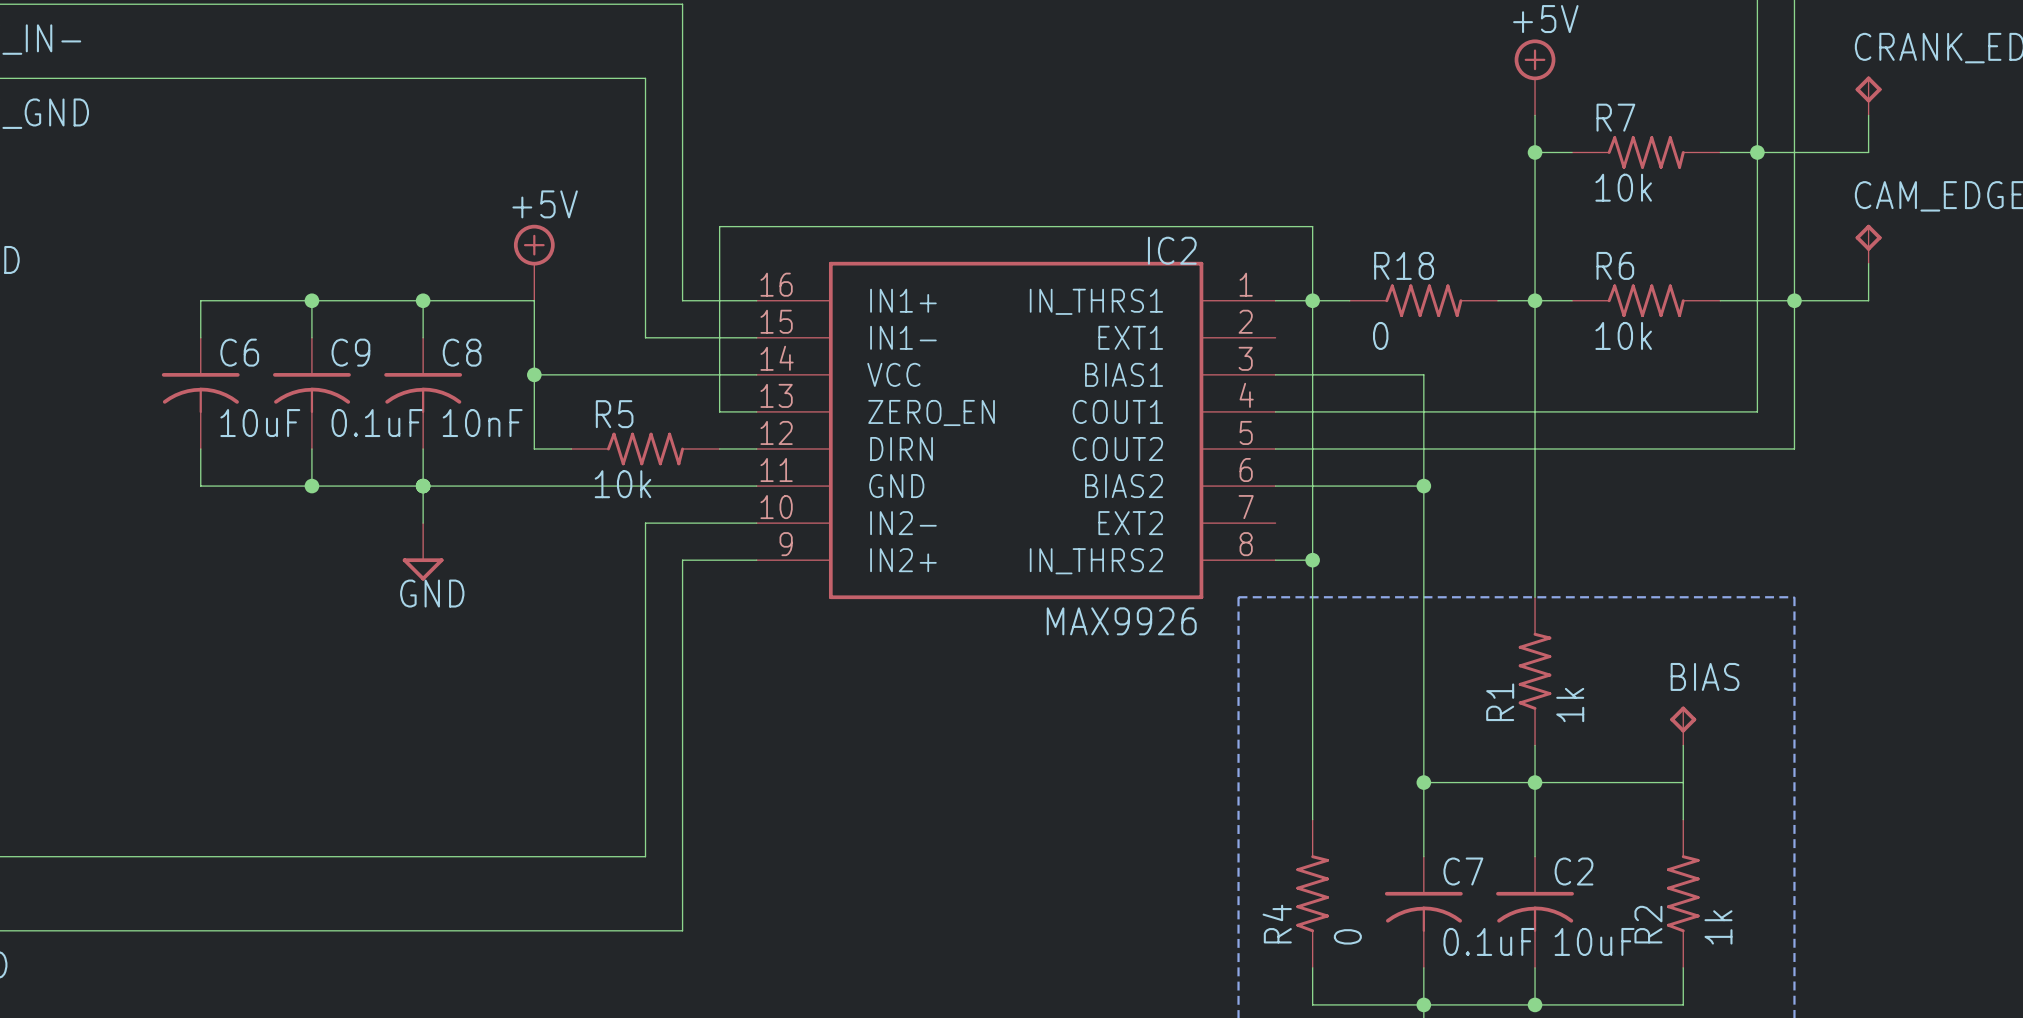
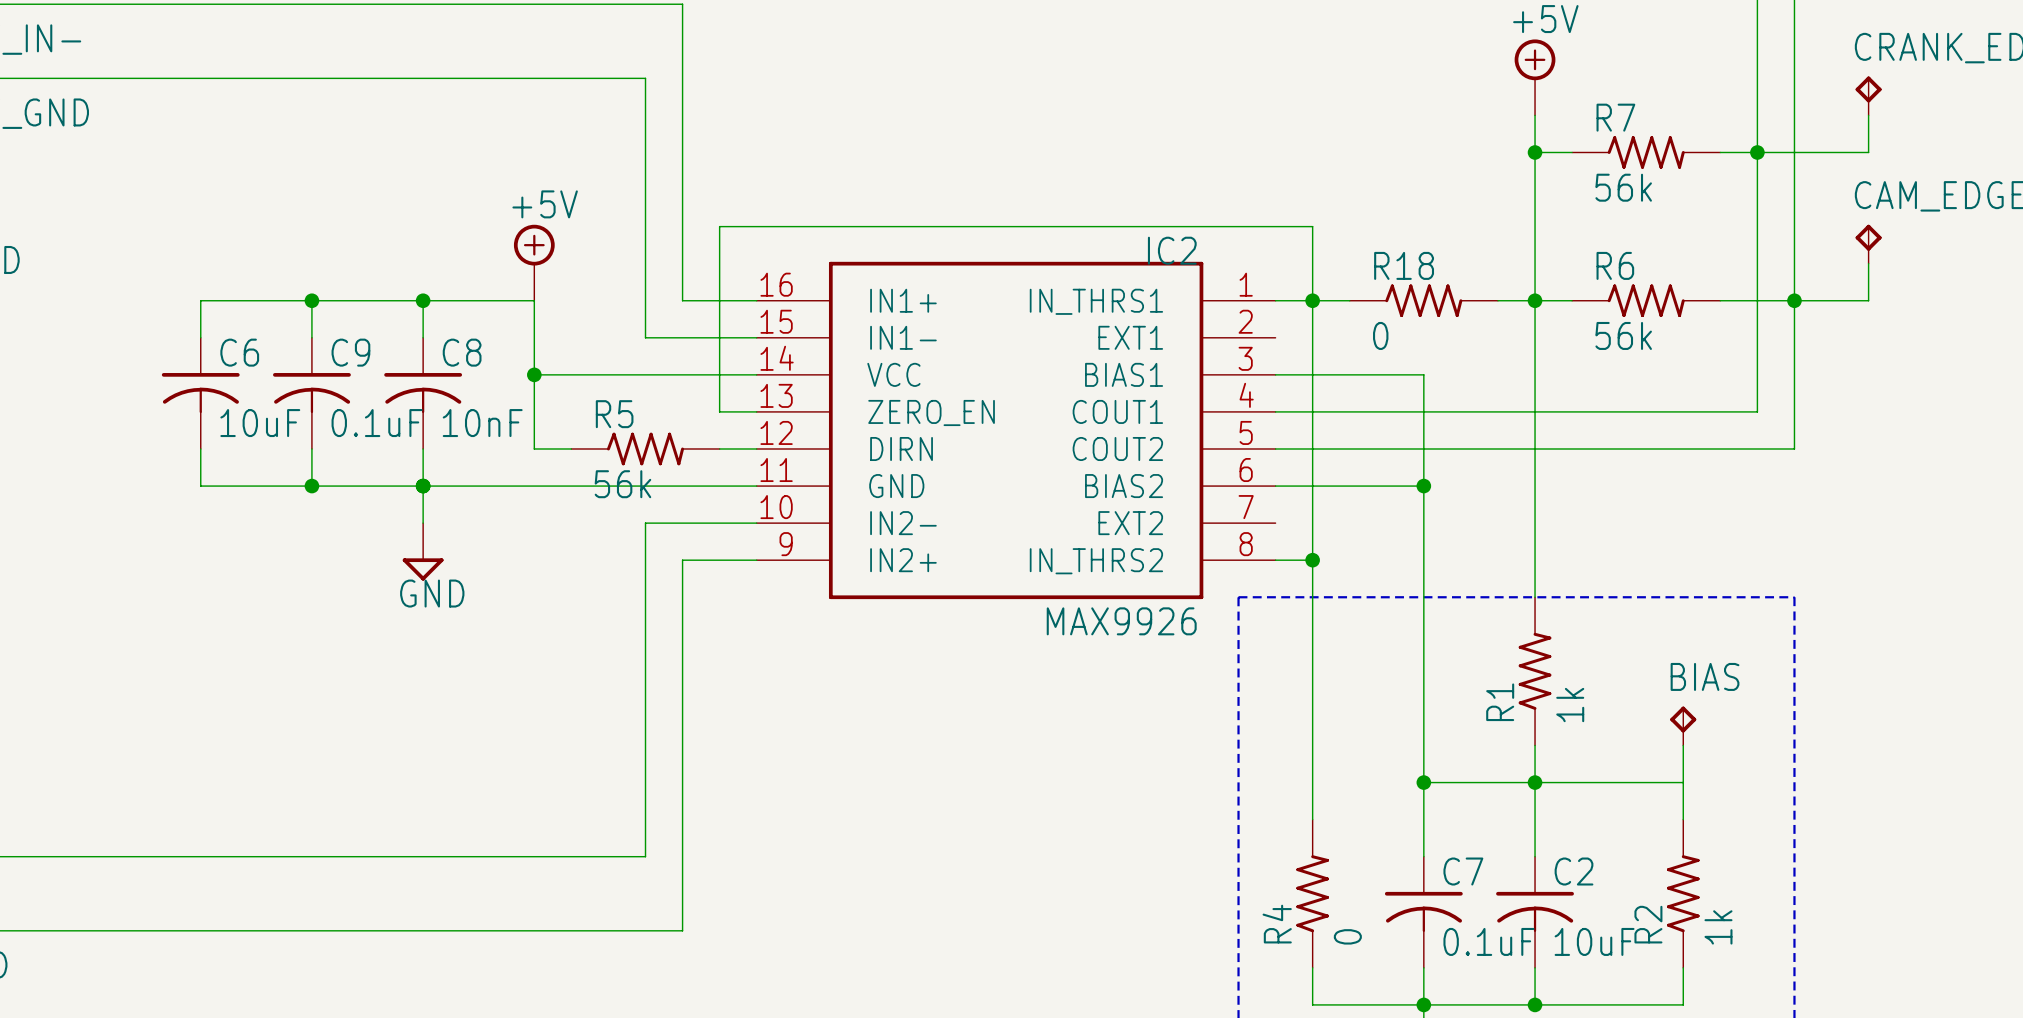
R7 value: 10k (1623, 187) -> 56k (1623, 187)
R6 value: 10k (1623, 335) -> 56k (1623, 335)
R5 value: 10k (622, 484) -> 56k (622, 484)

